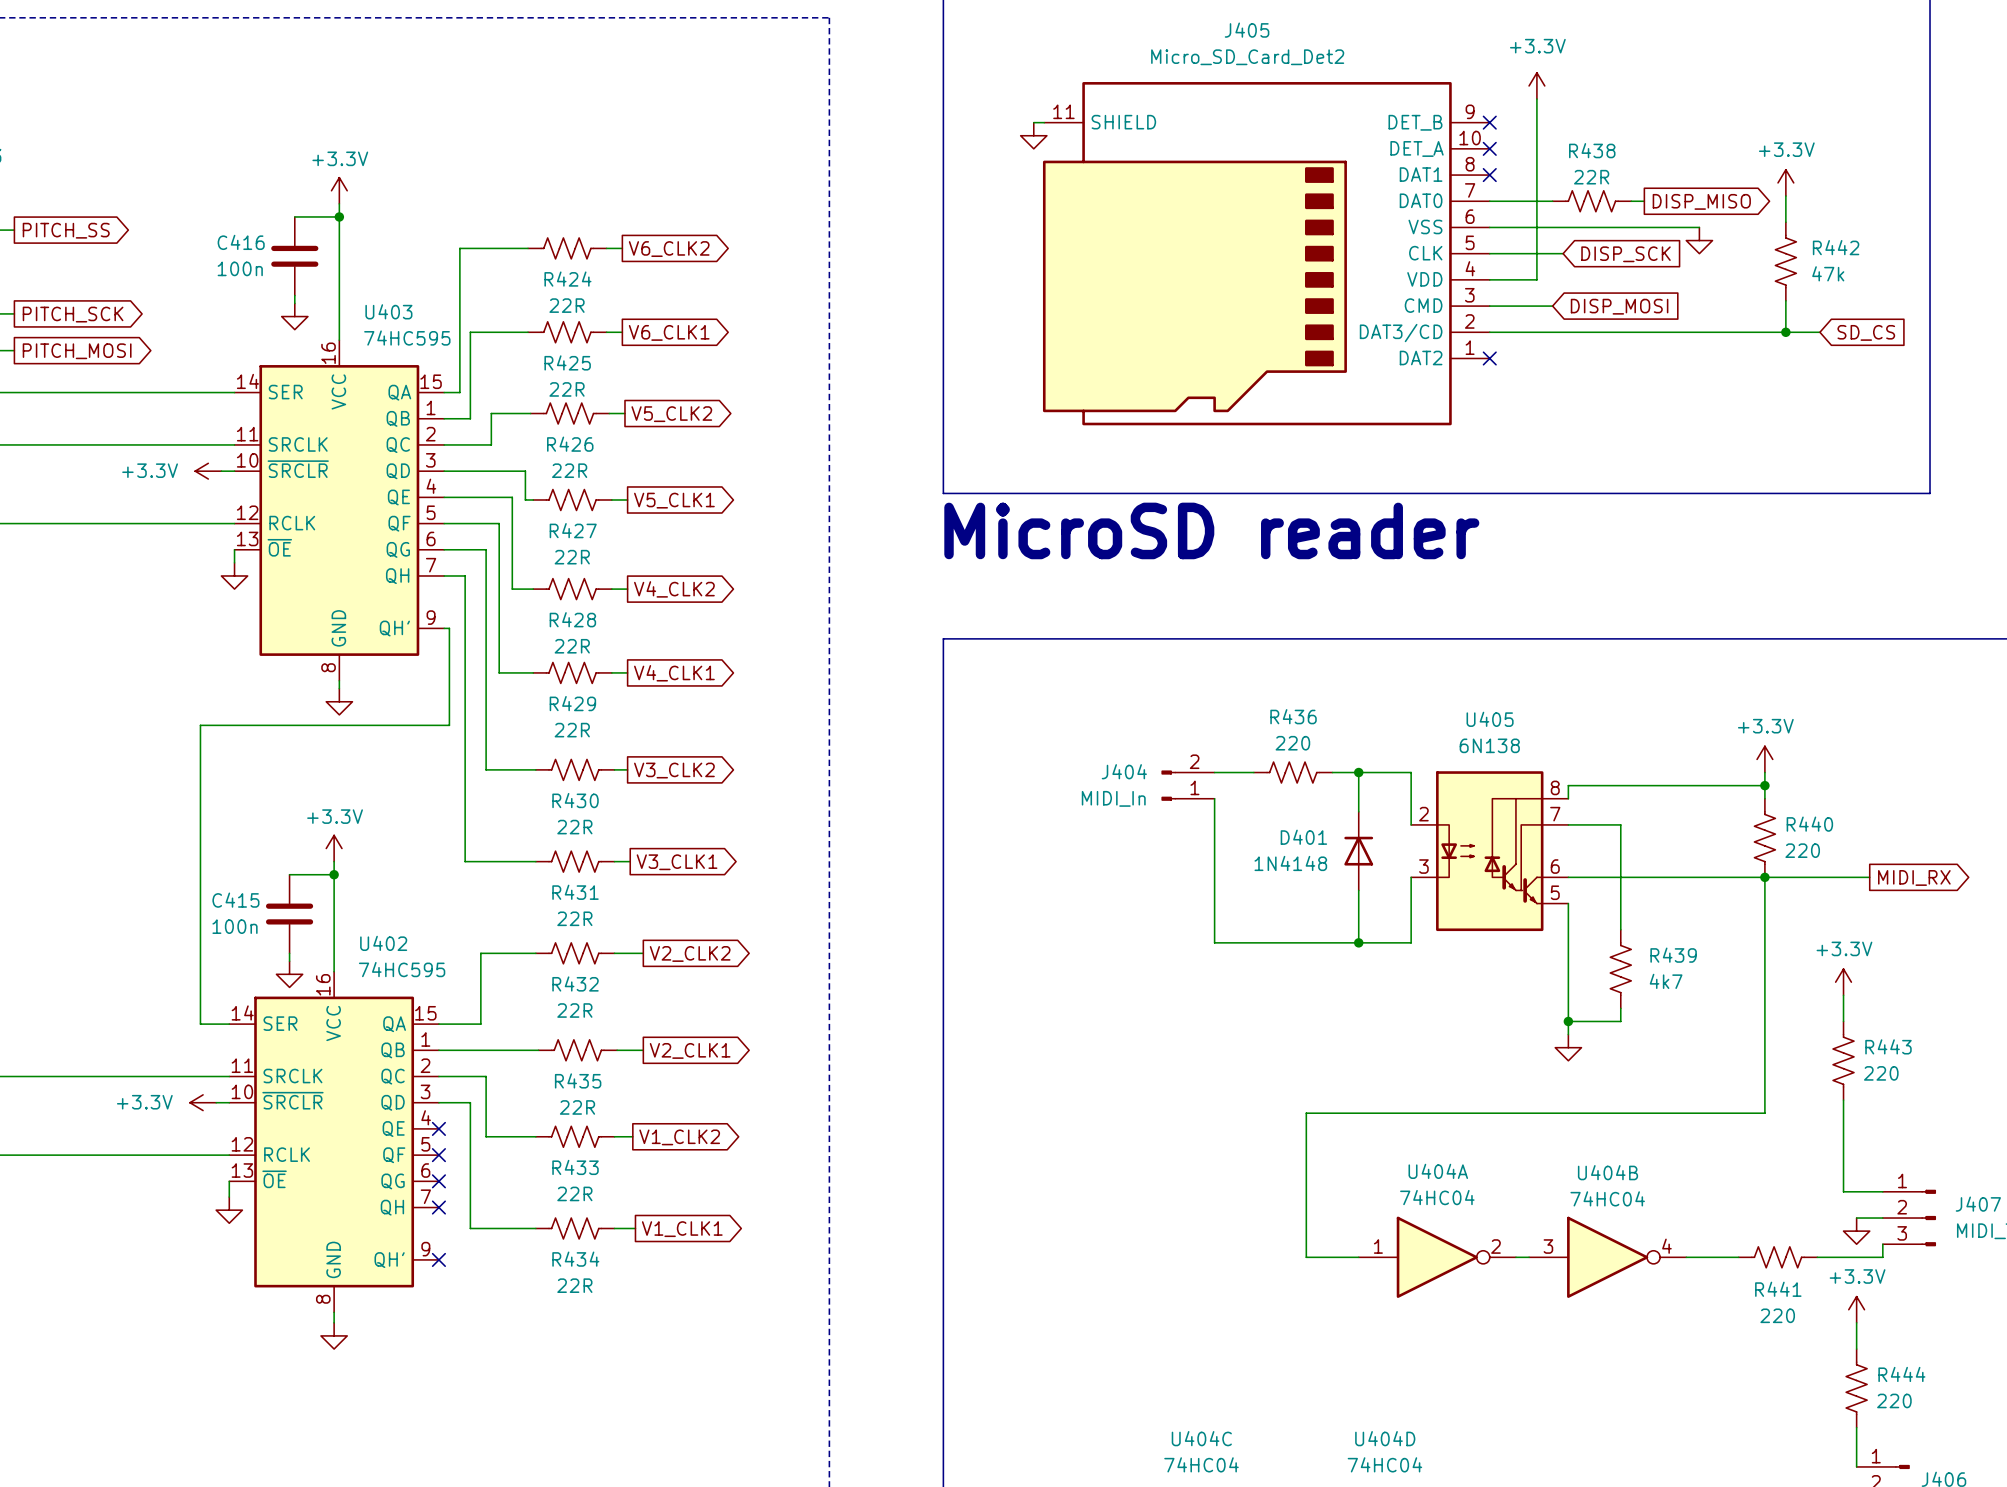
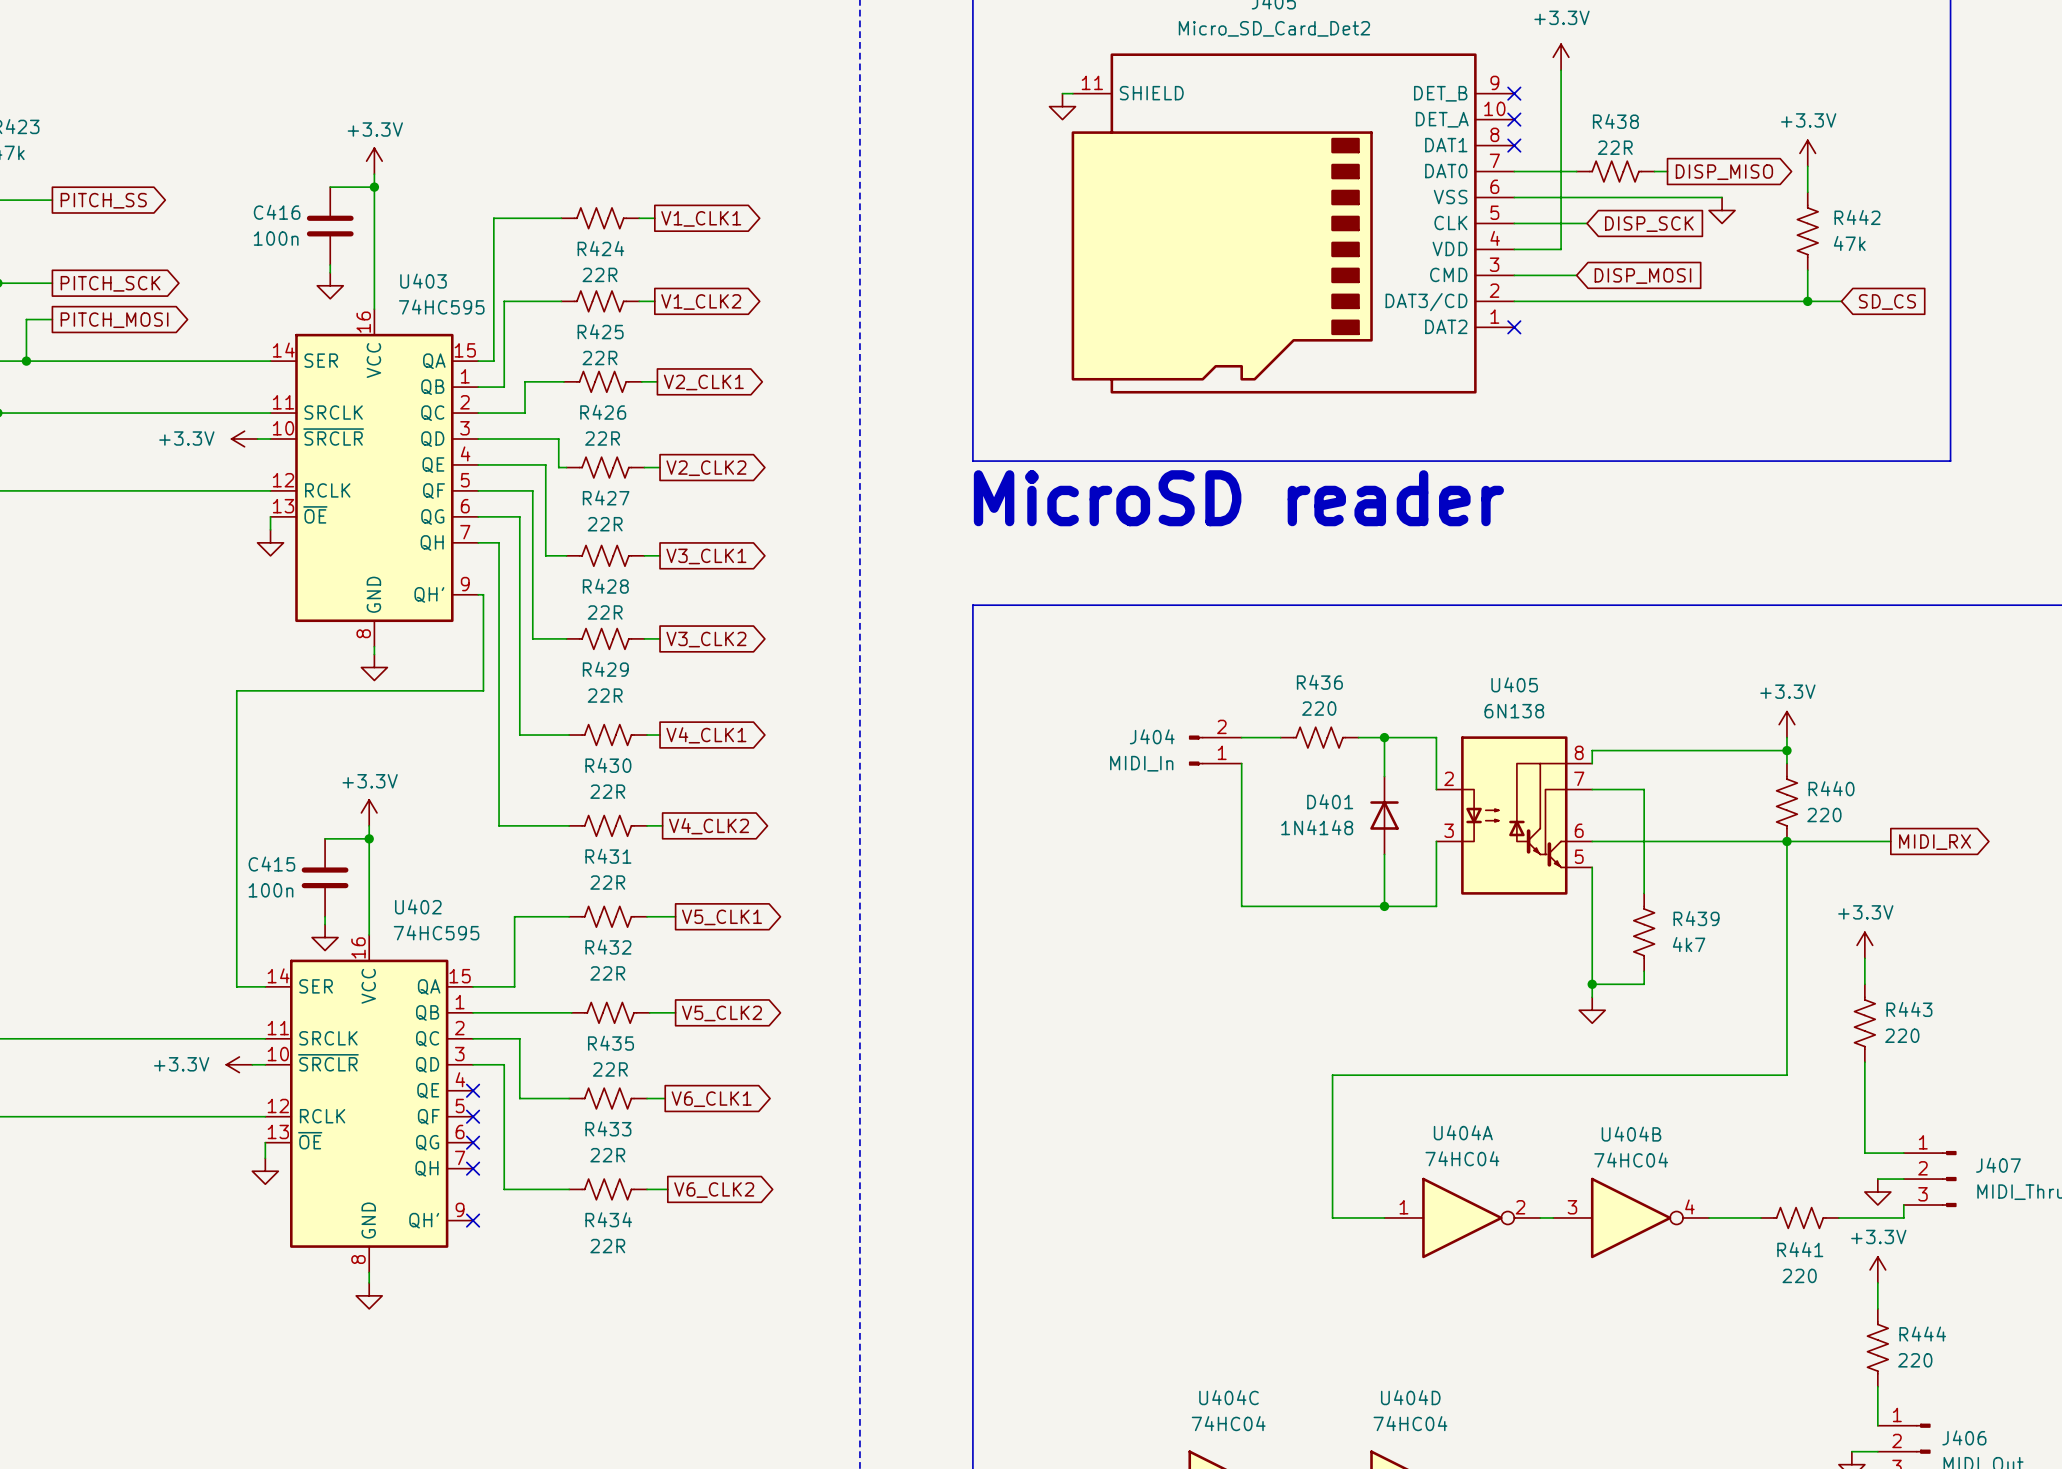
global label: V6_CLK2 (669, 249) -> V1_CLK1 (701, 218)
global label: V6_CLK1 (669, 332) -> V1_CLK2 (701, 301)
global label: V5_CLK2 (671, 414) -> V2_CLK1 (703, 382)
global label: V5_CLK1 (674, 500) -> V2_CLK2 (706, 468)
global label: V4_CLK2 (674, 589) -> V3_CLK1 (706, 556)
global label: V4_CLK1 (674, 673) -> V3_CLK2 (706, 639)
global label: V3_CLK2 (674, 770) -> V4_CLK1 (706, 735)
global label: V3_CLK1 (677, 862) -> V4_CLK2 (709, 826)
global label: V2_CLK2 (690, 953) -> V5_CLK1 (721, 917)
global label: V2_CLK1 (690, 1050) -> V5_CLK2 (721, 1013)
global label: V1_CLK2 (679, 1137) -> V6_CLK1 (711, 1099)
global label: V1_CLK1 (682, 1229) -> V6_CLK2 (714, 1190)

